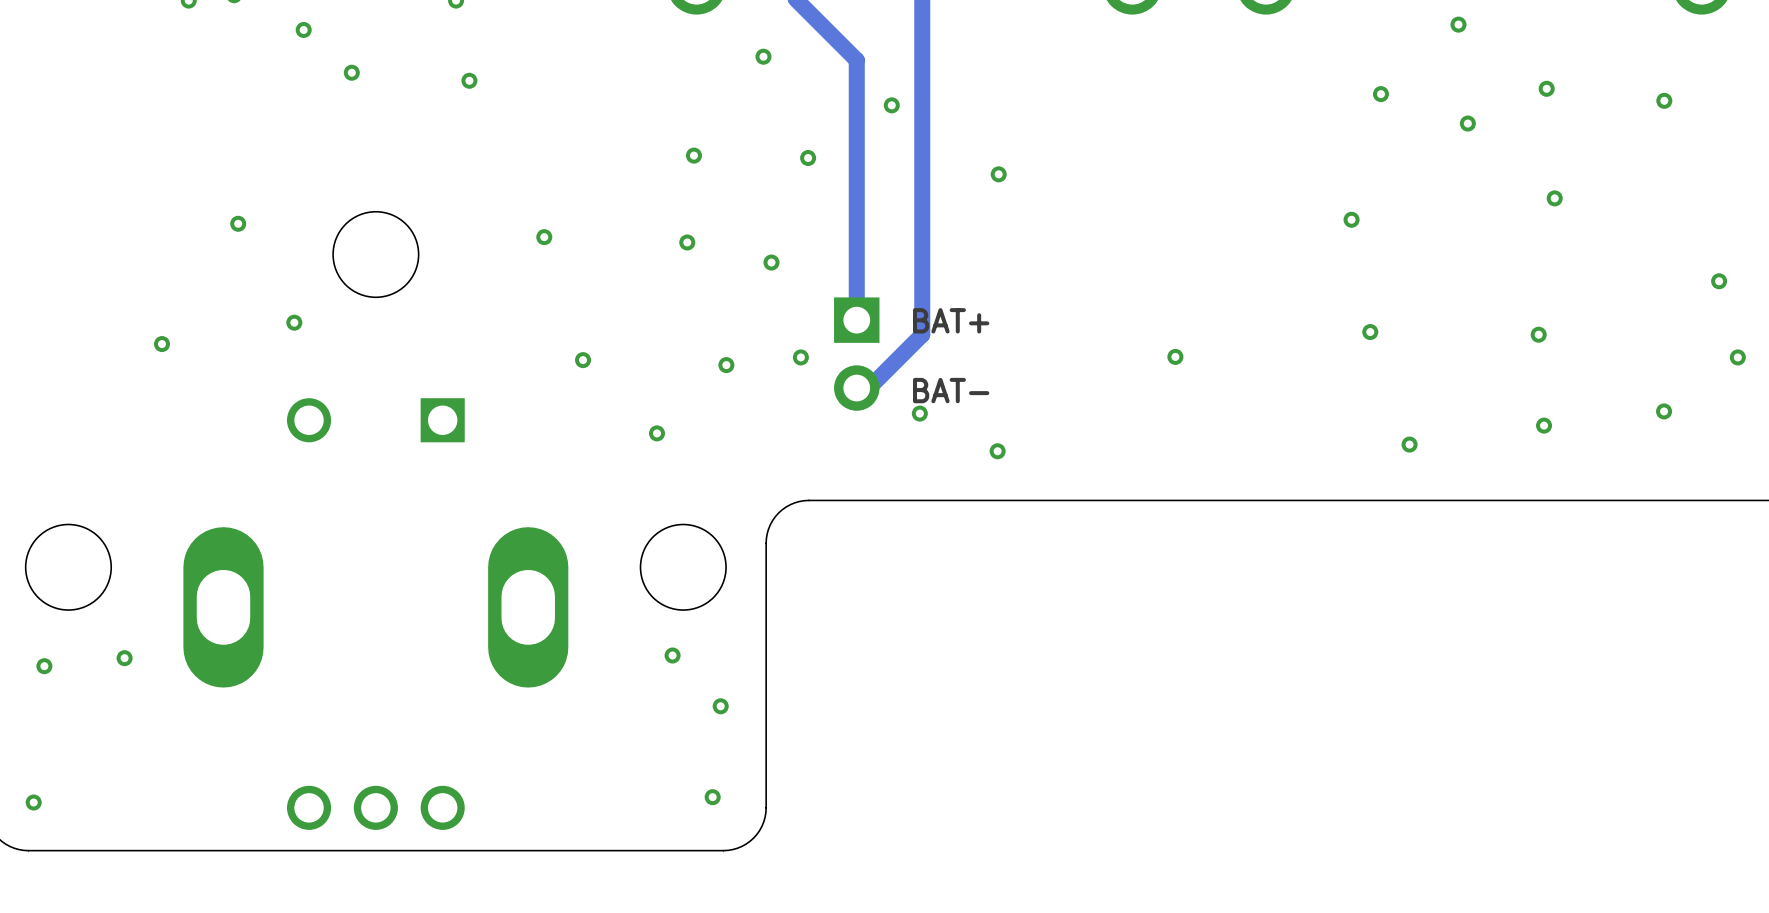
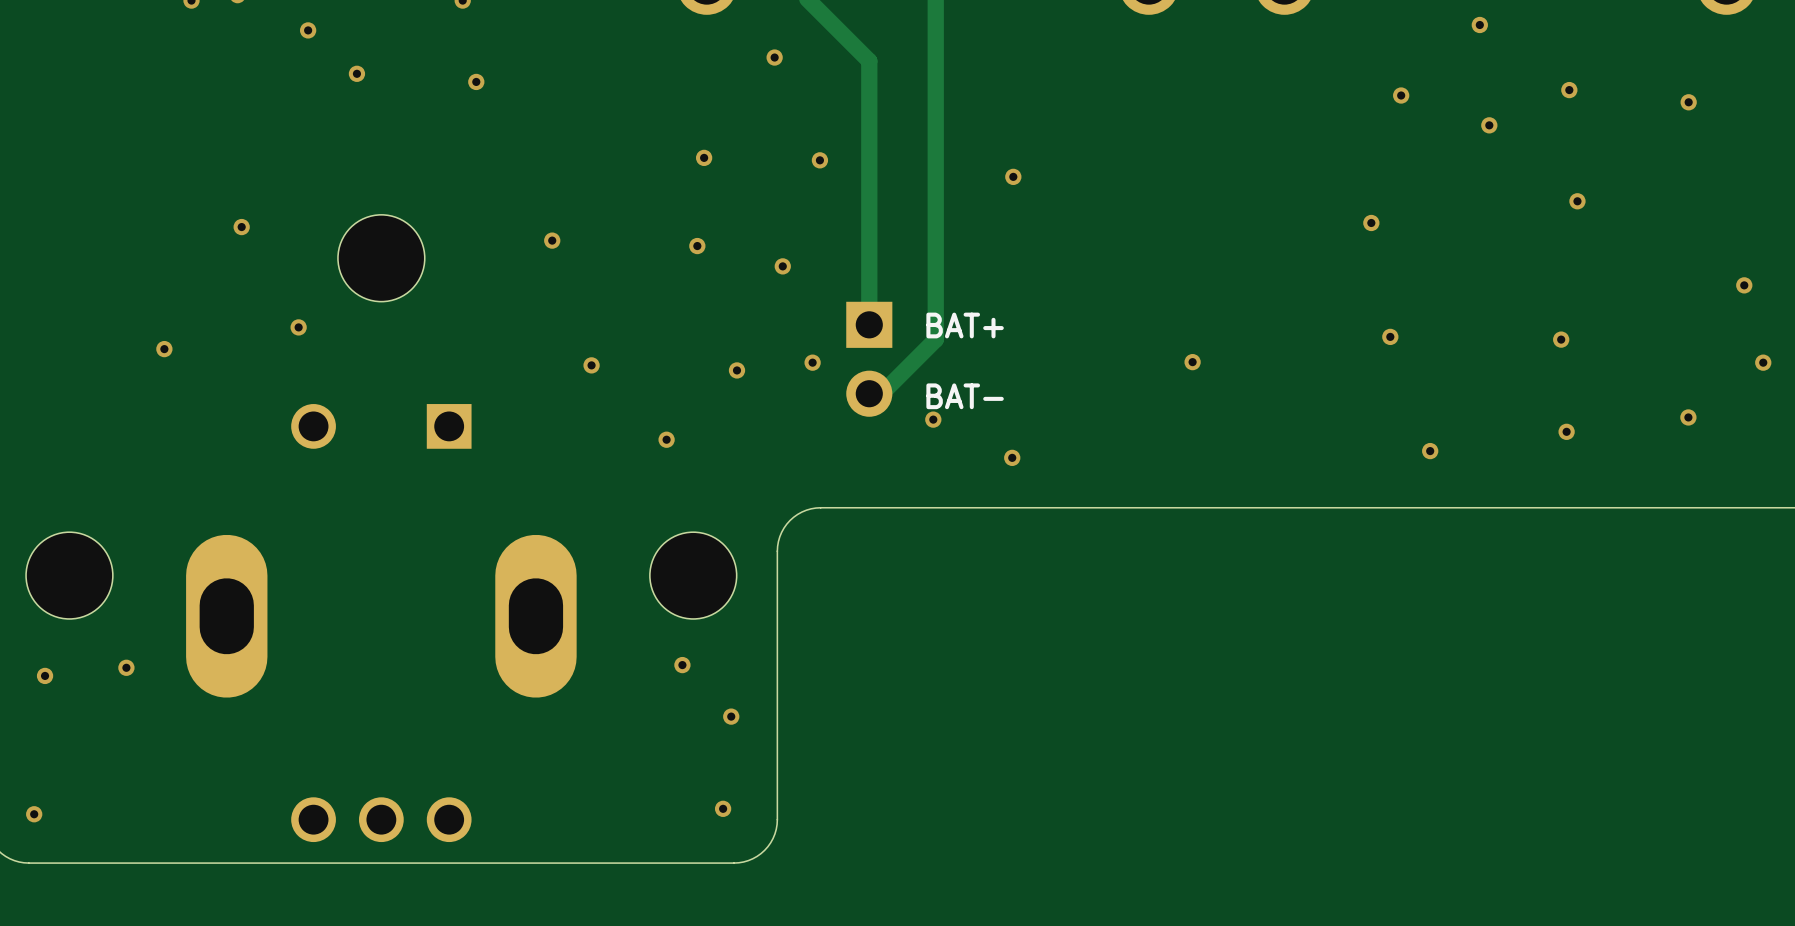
via: (891, 105) -> none

